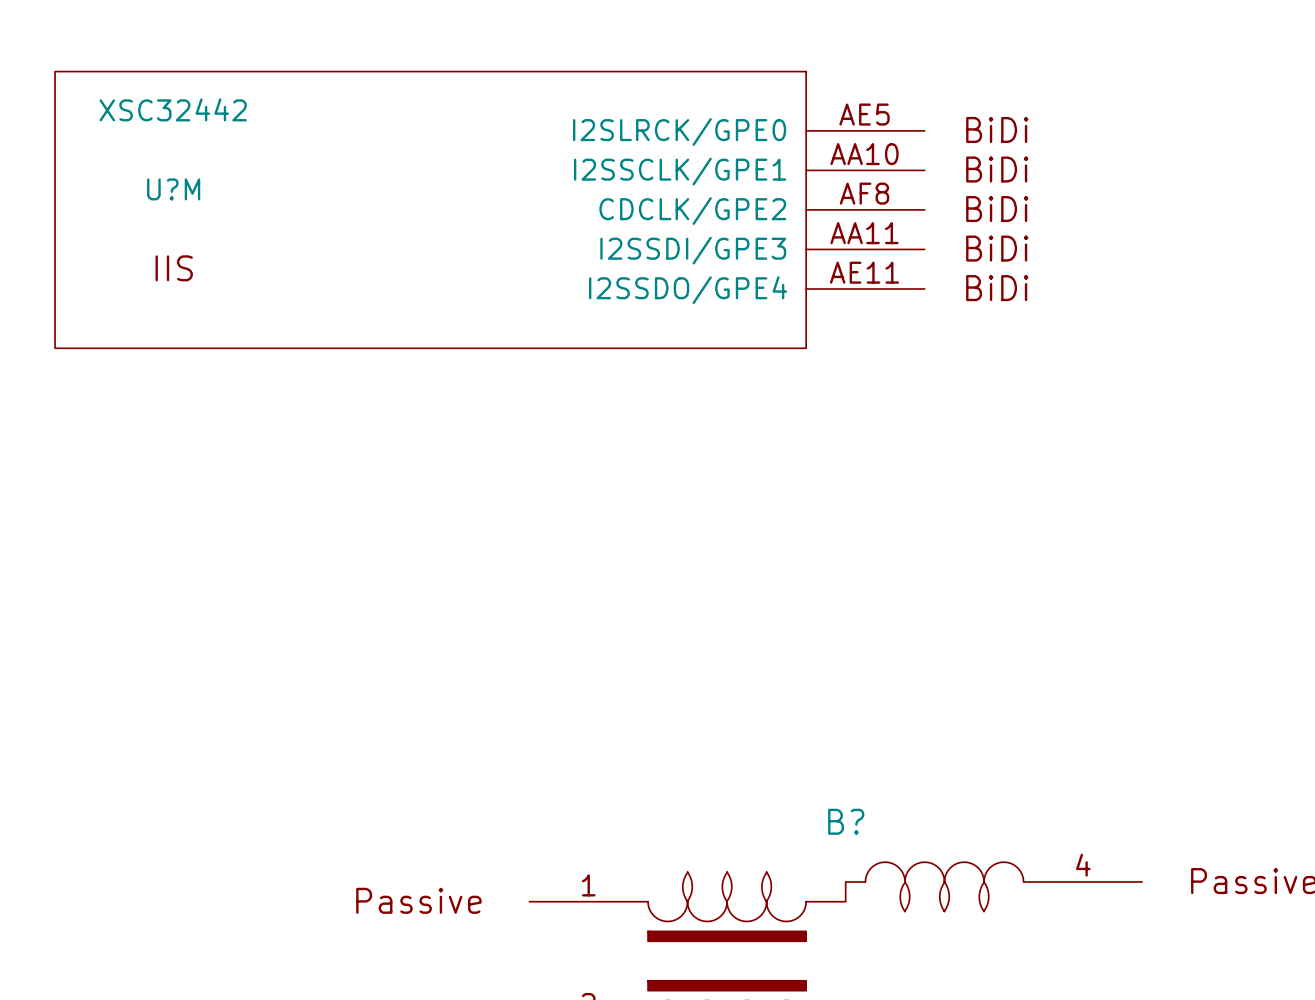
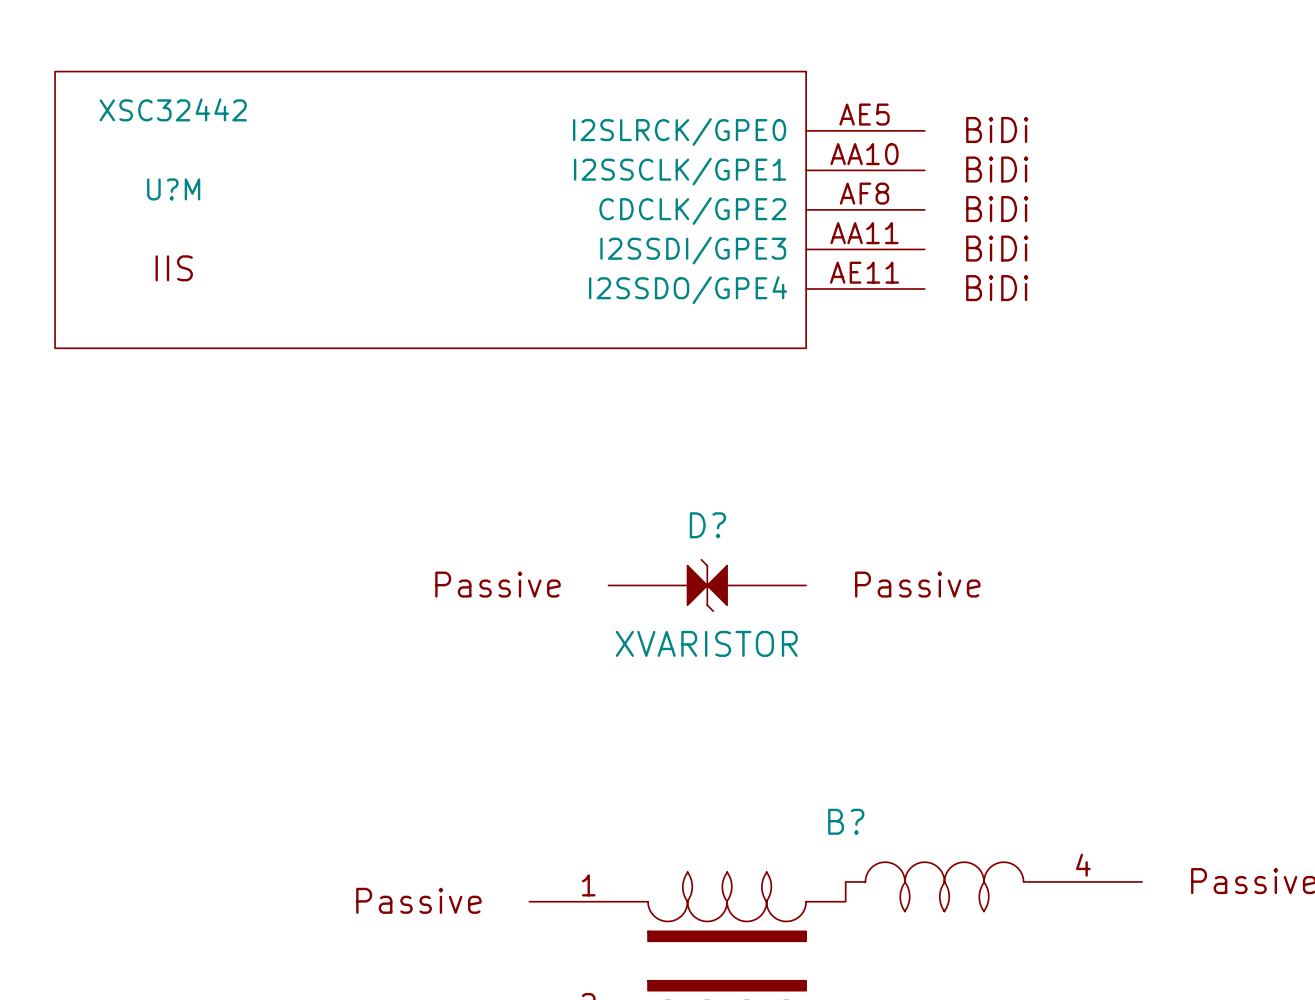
D?: none -> XVARISTOR (707, 585)

